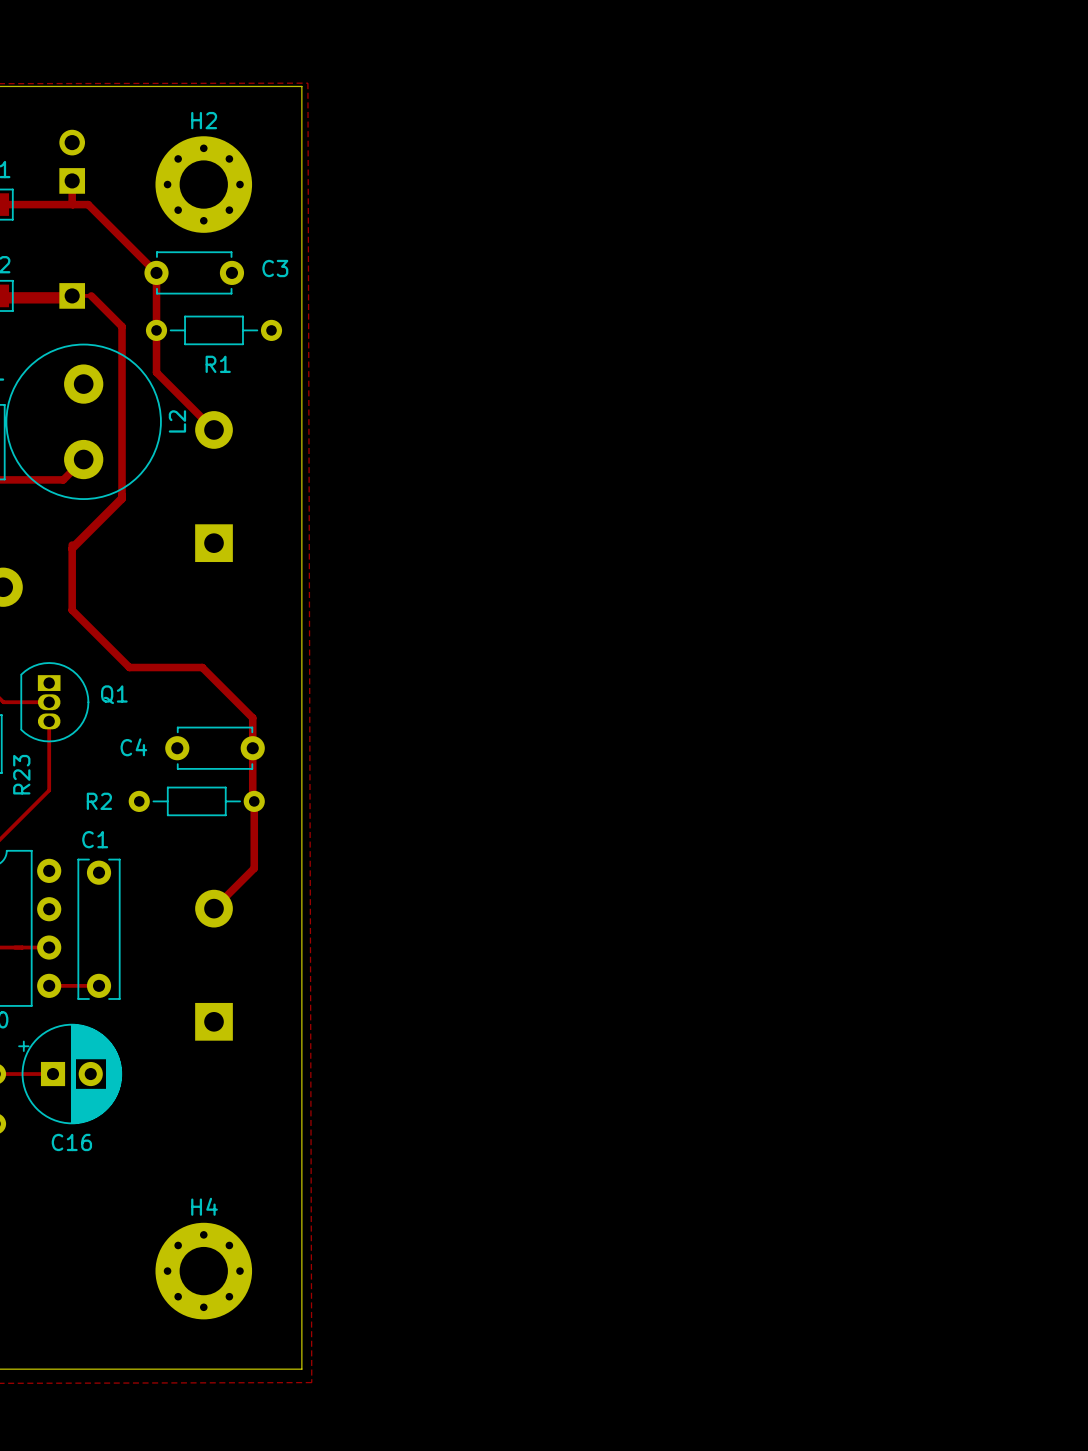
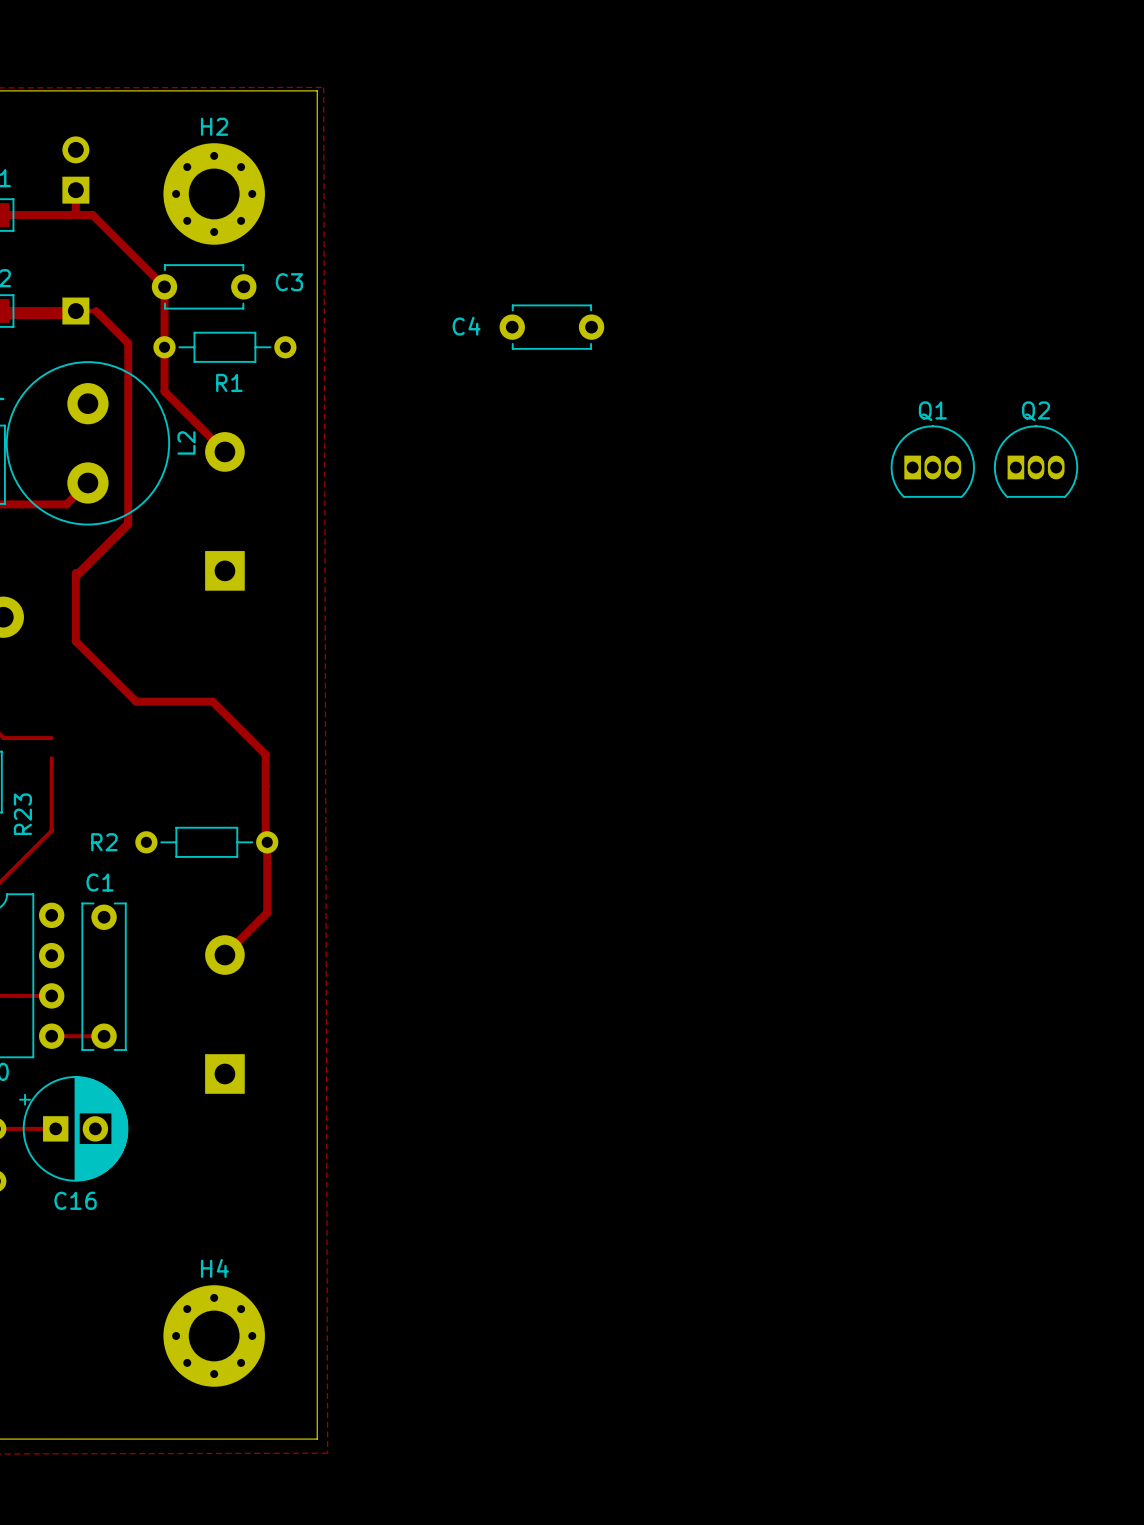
Q2: none -> (1036, 461)
Q1 rotation: 0° (54, 702) -> 90° counterclockwise (932, 461)
Q1 position: (54, 702) -> (932, 461)
C4 position: (215, 748) -> (551, 327)

